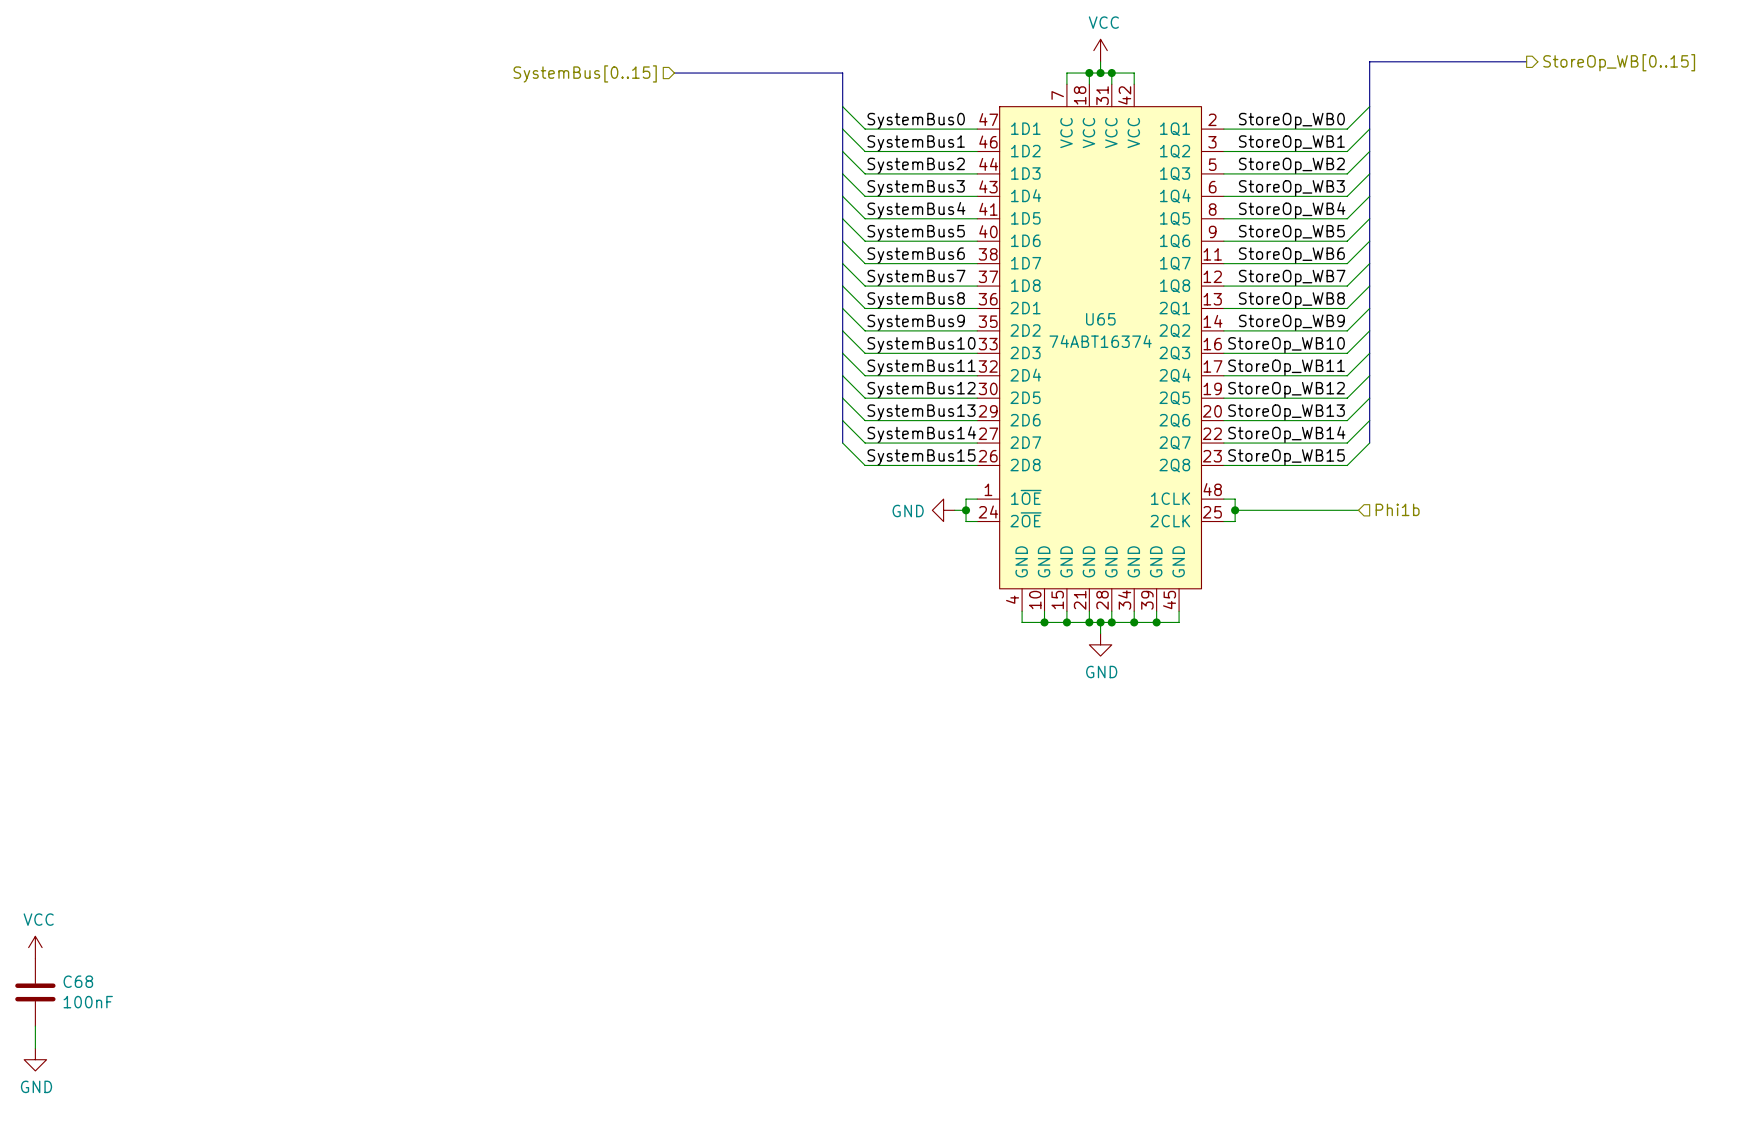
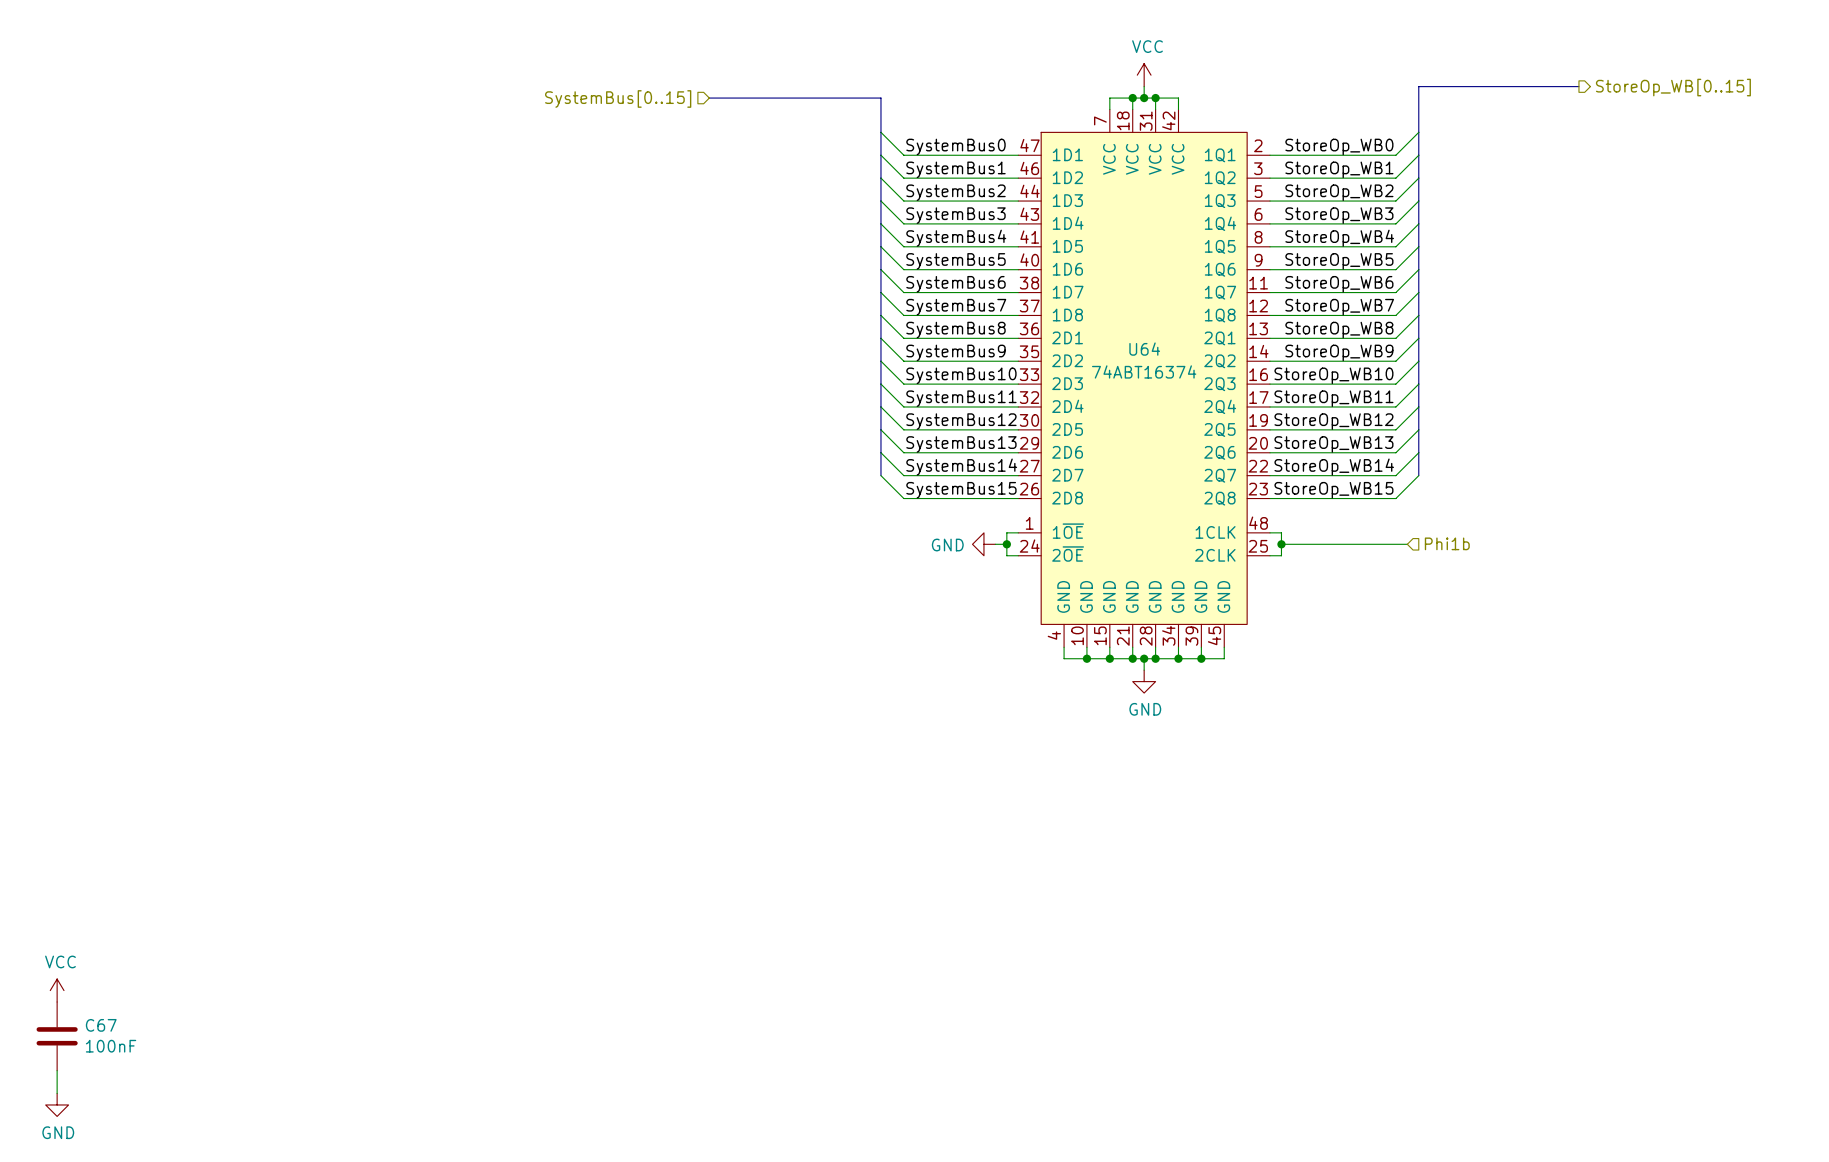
U65 name: U65 (1100, 319) -> U64 (1144, 349)
C68 name: C68 (78, 981) -> C67 (101, 1025)

